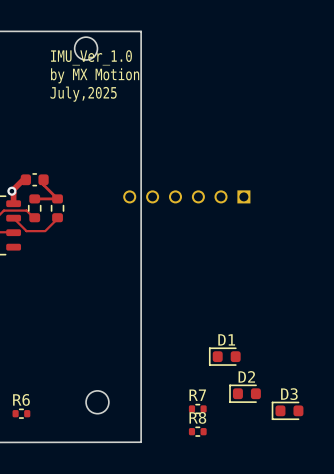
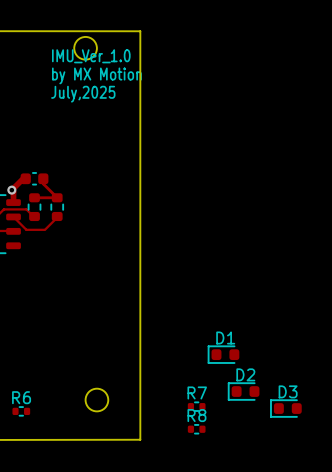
part: (186, 196) -> none

